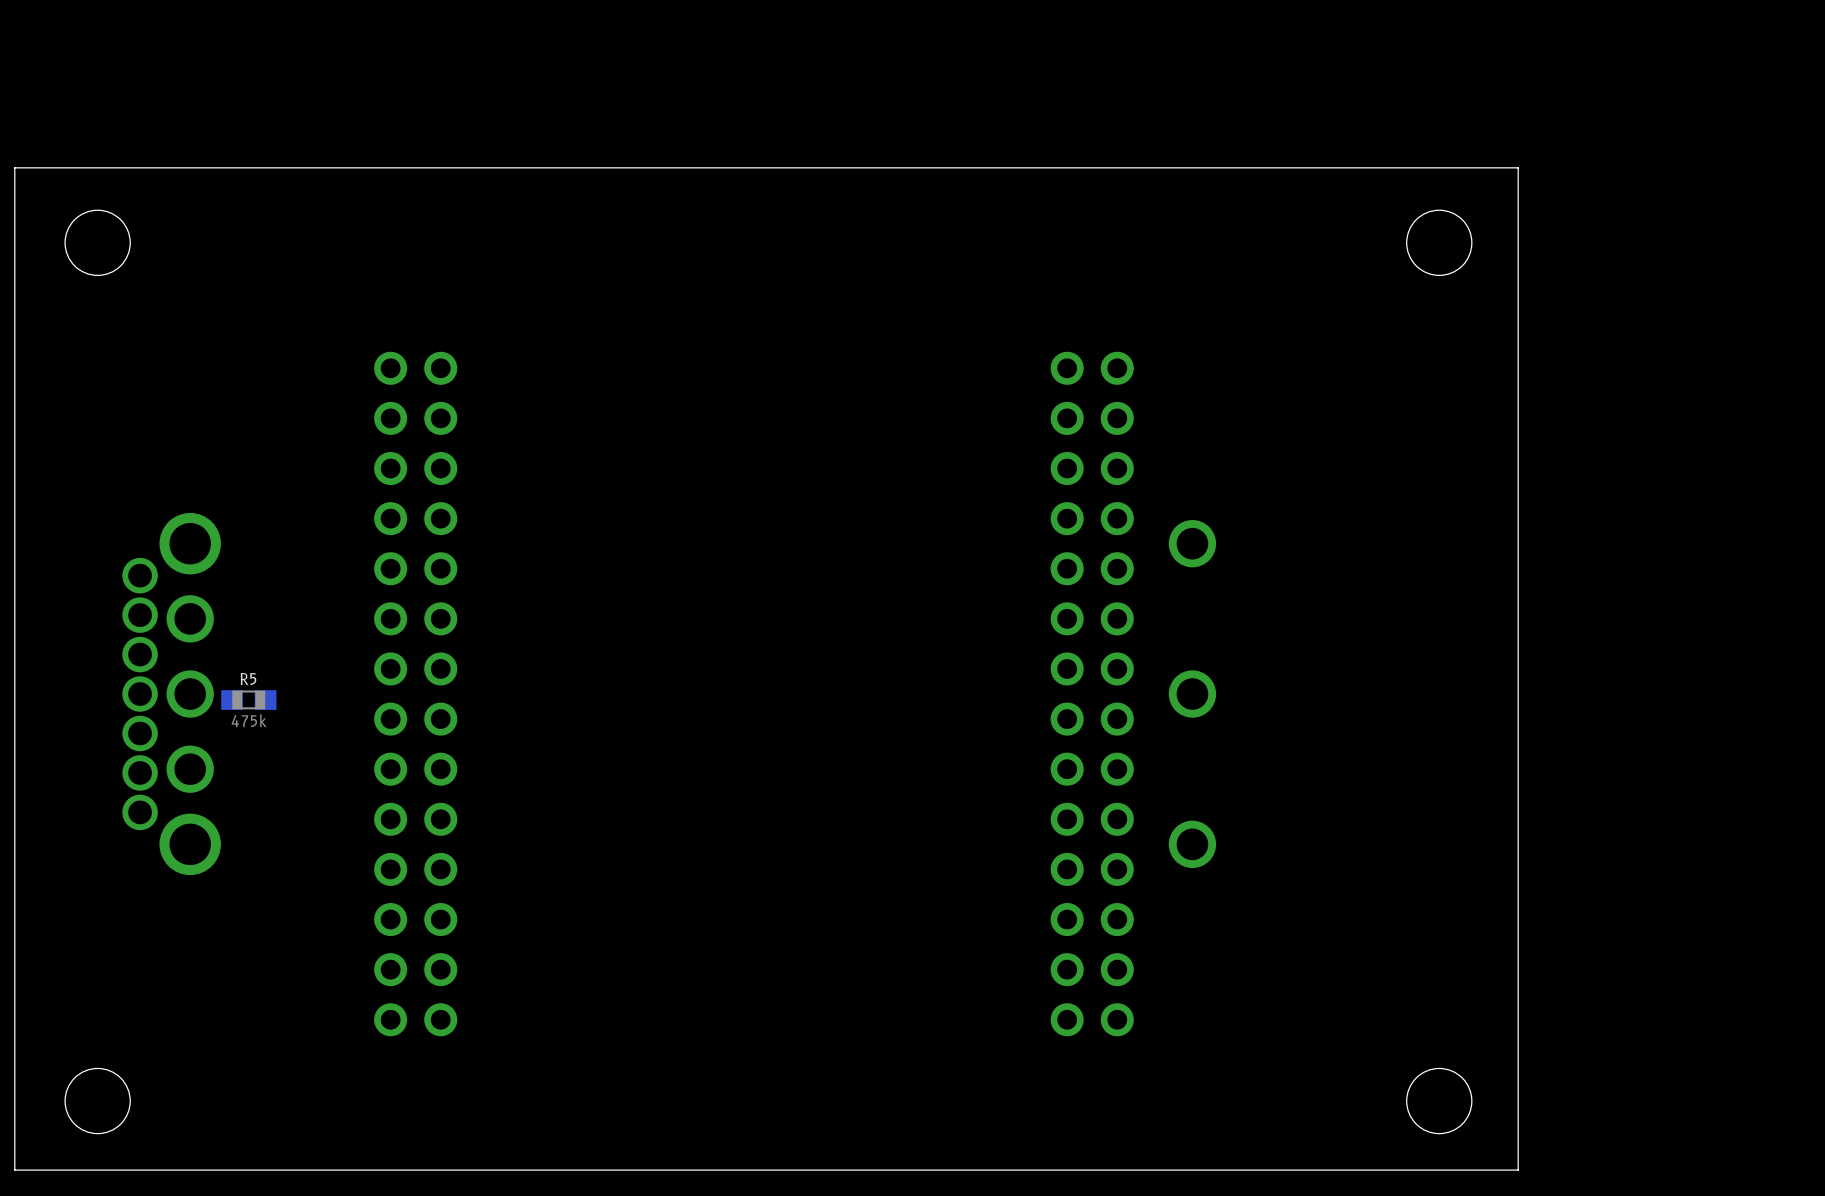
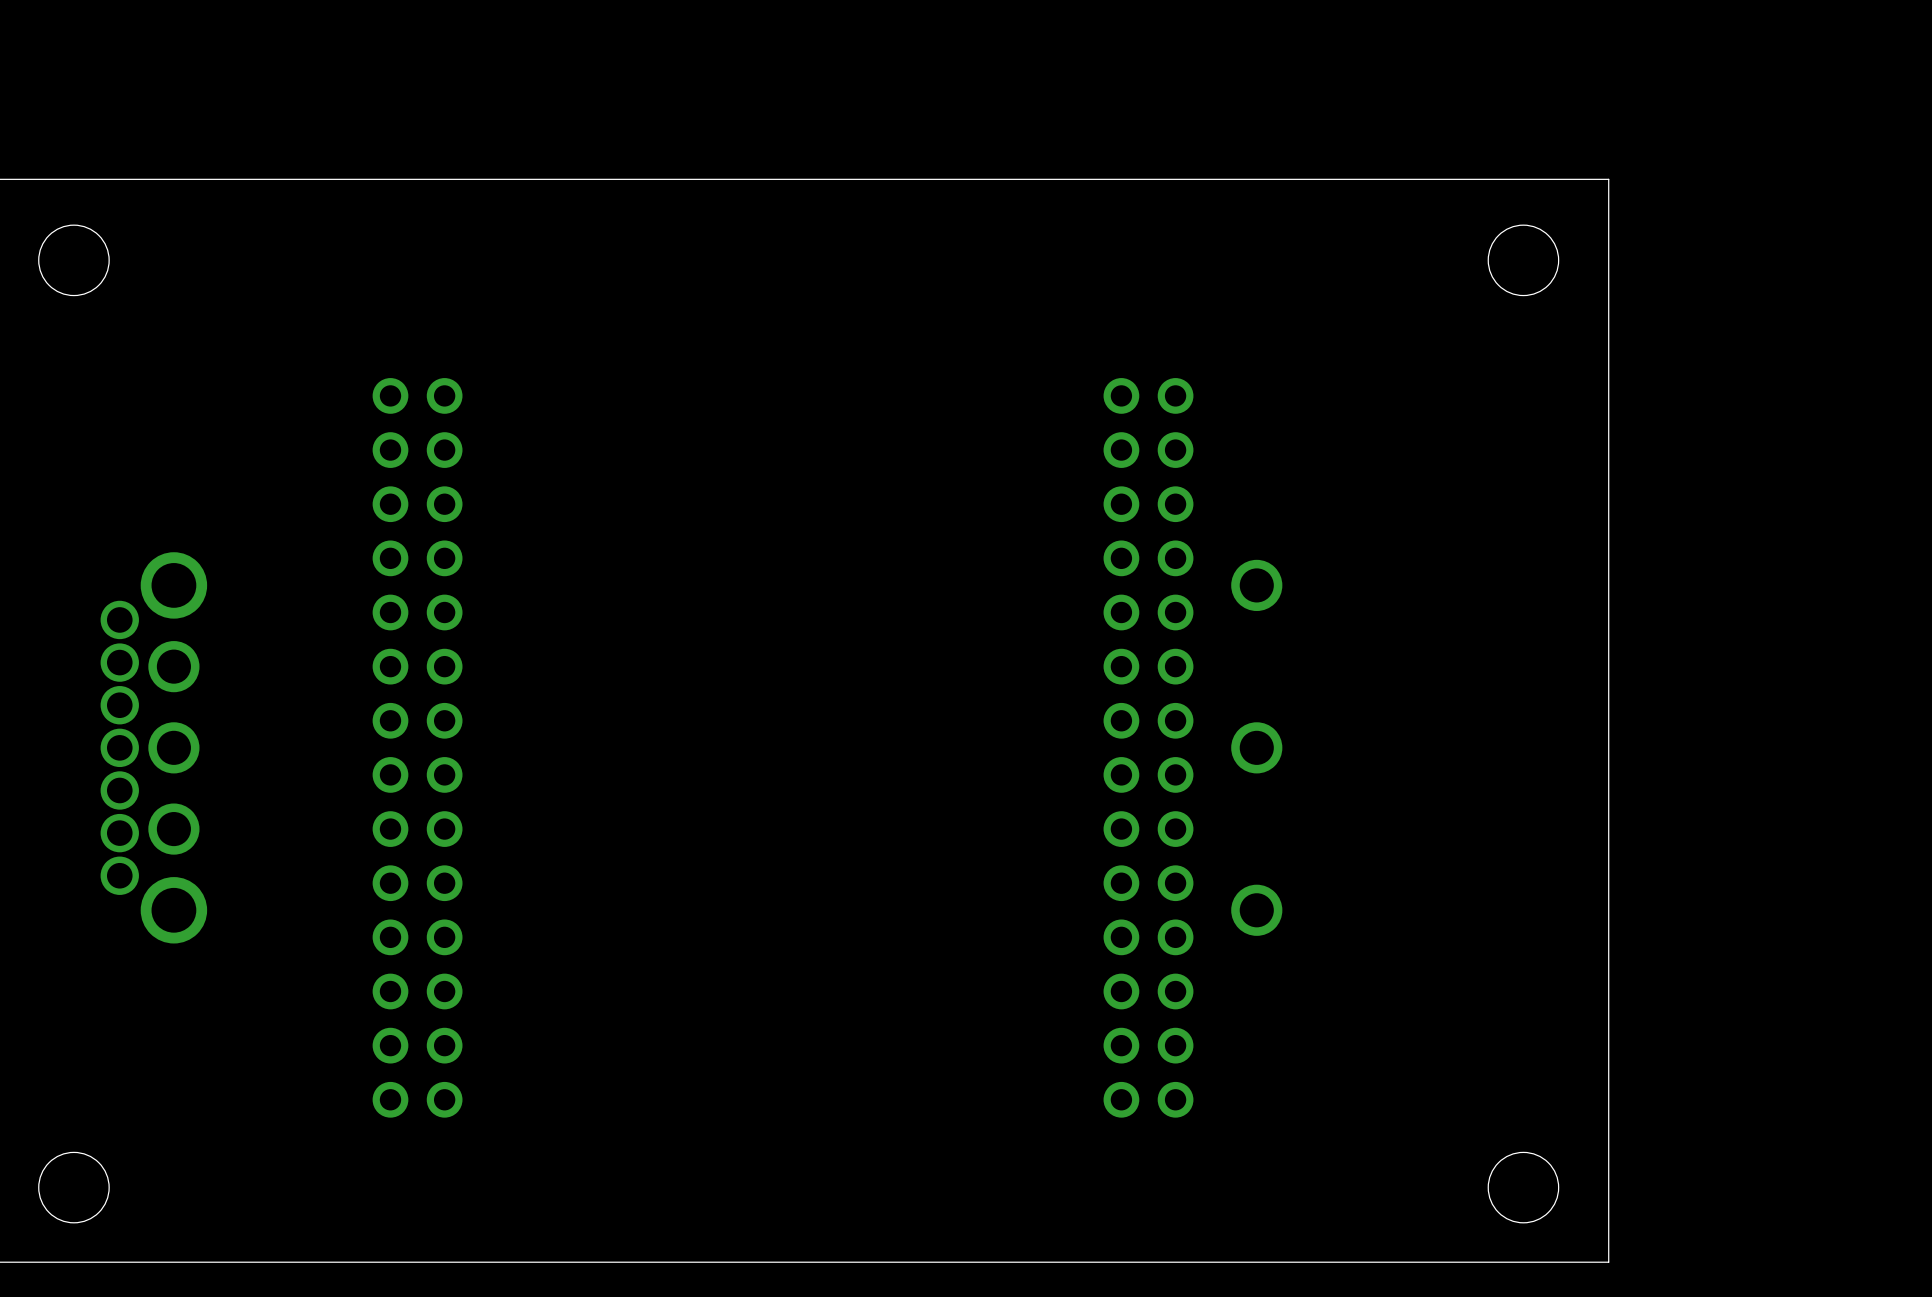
R5: 475k (248, 700) -> none

